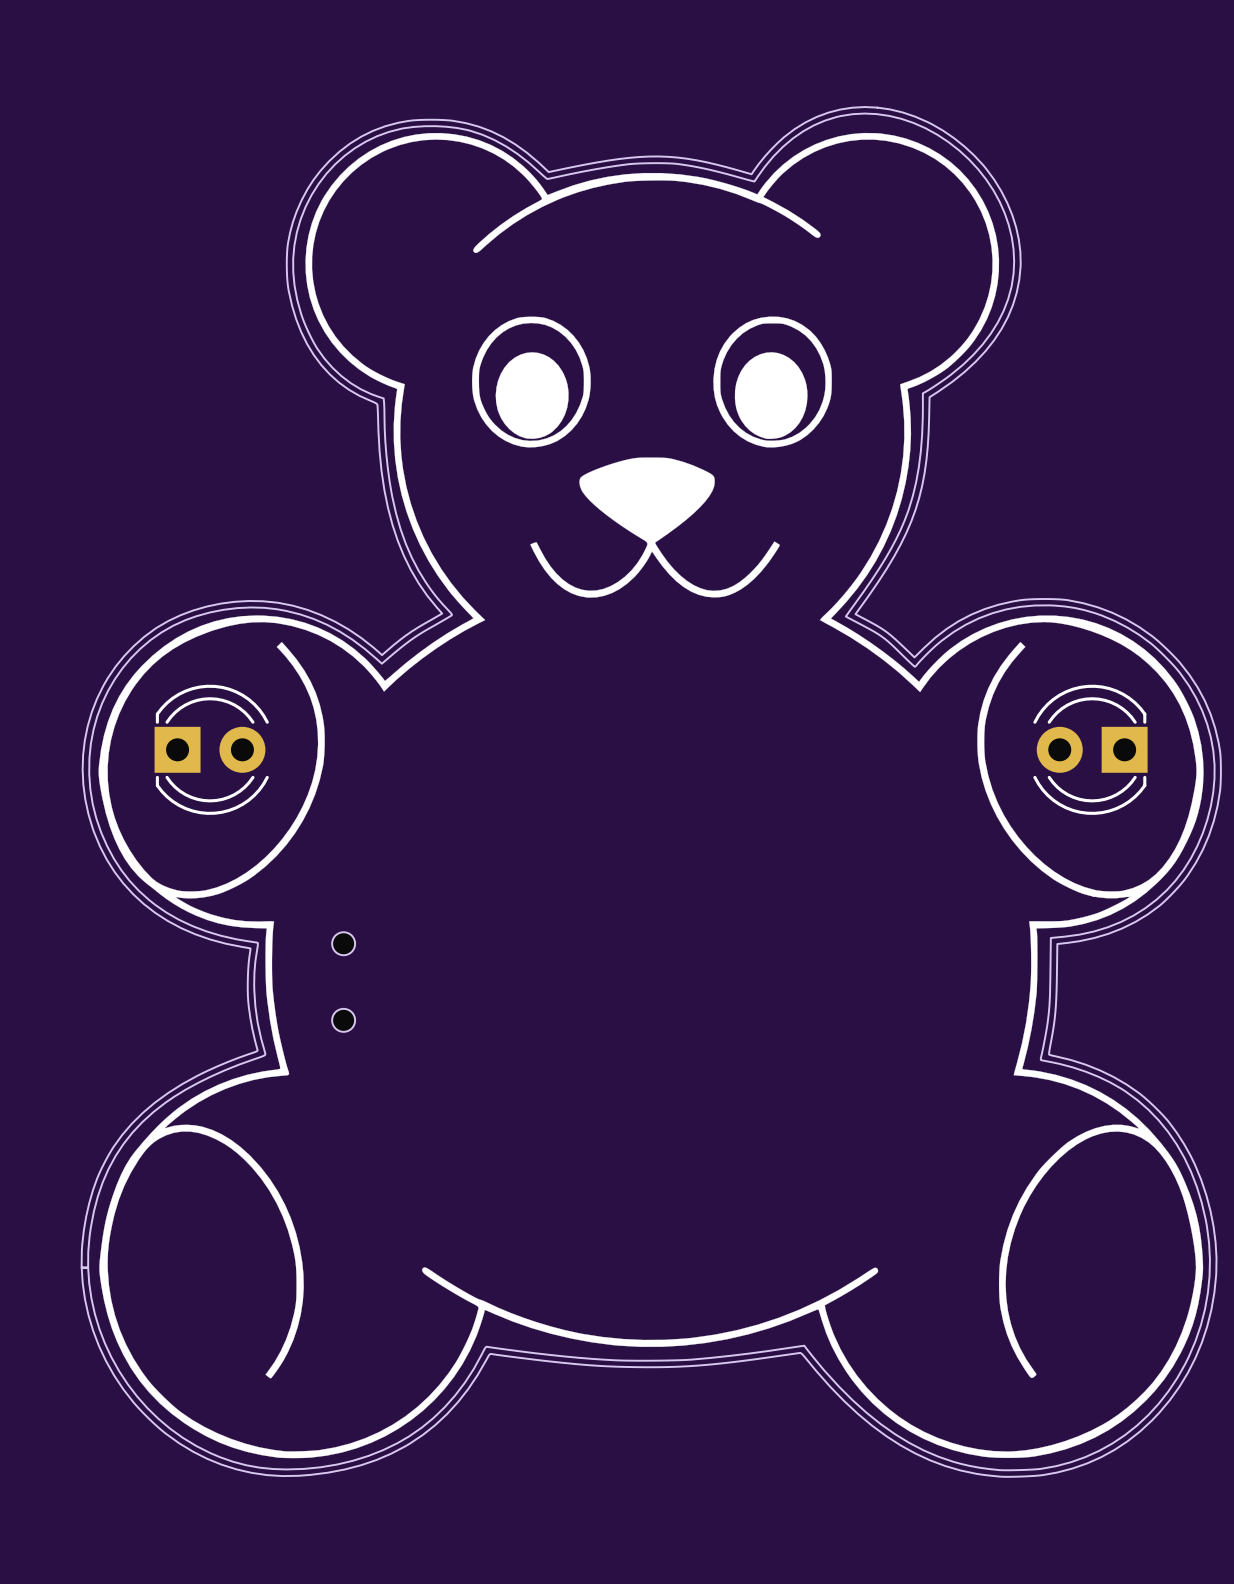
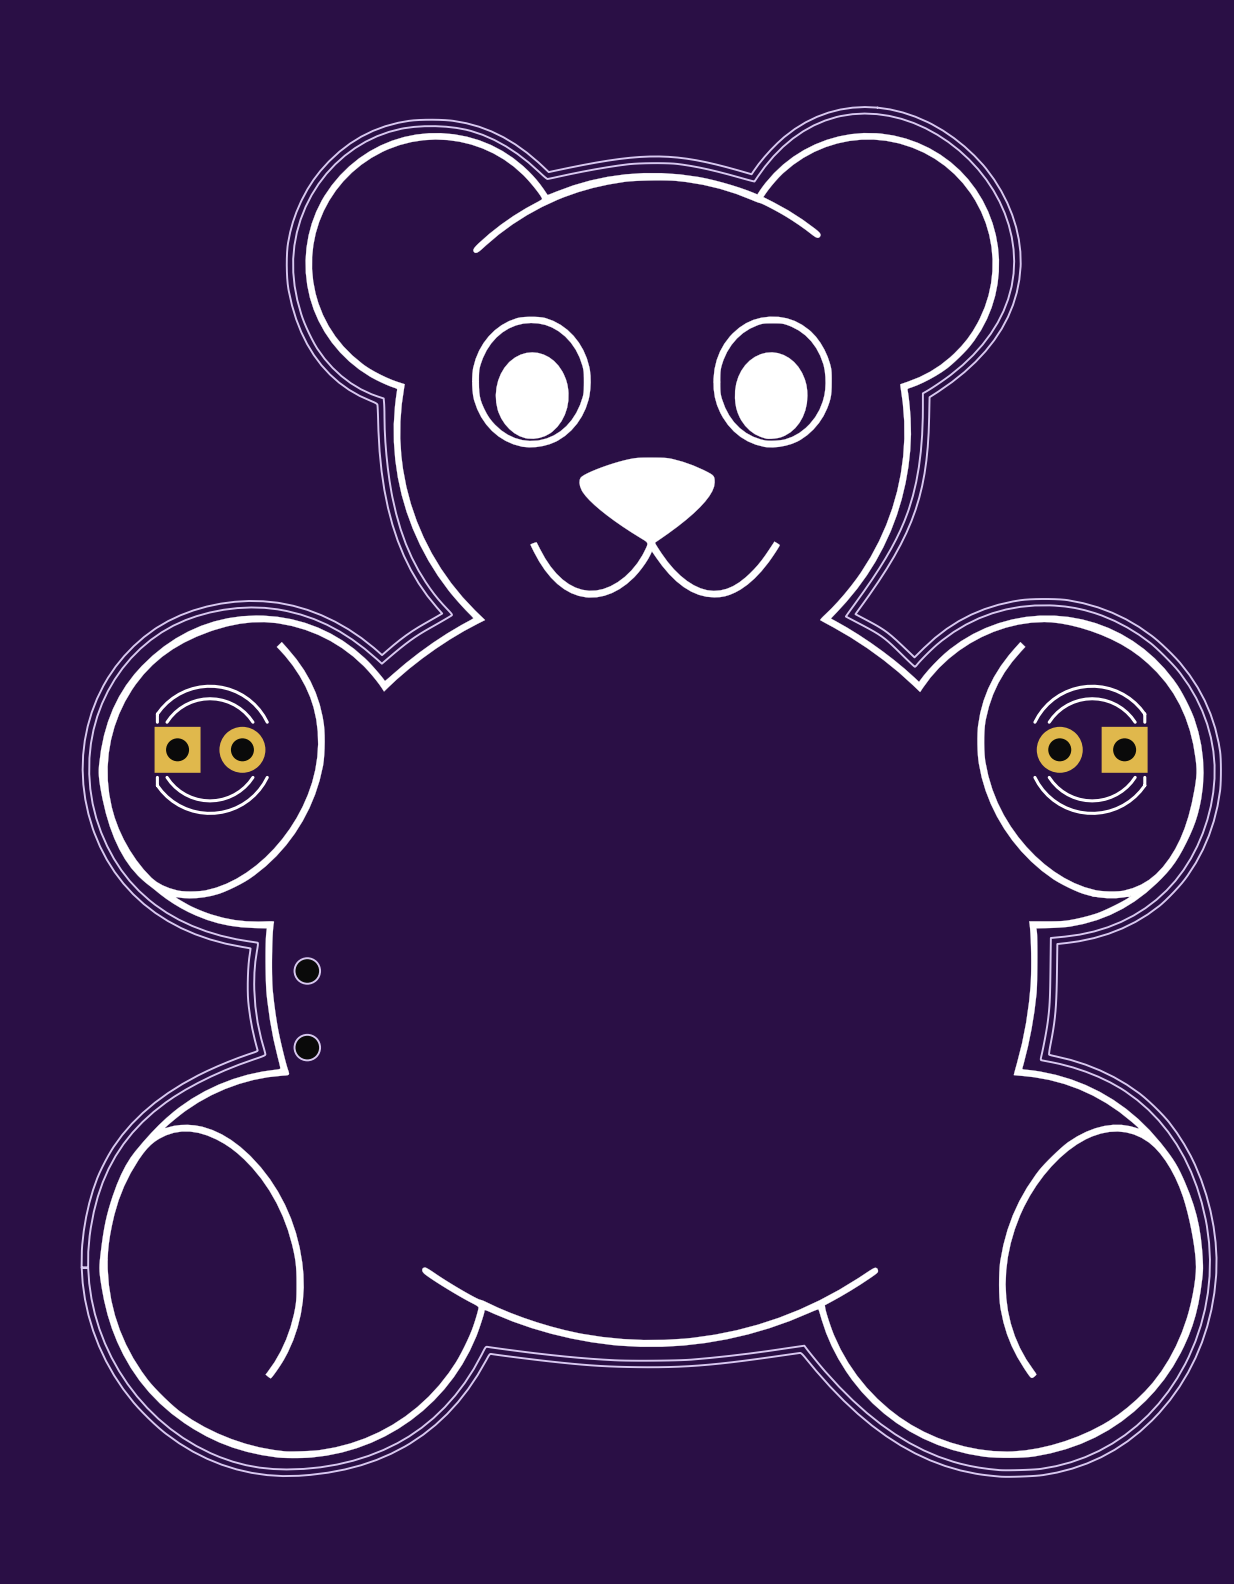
part: (343, 982) -> none
part: none -> (307, 1009)

